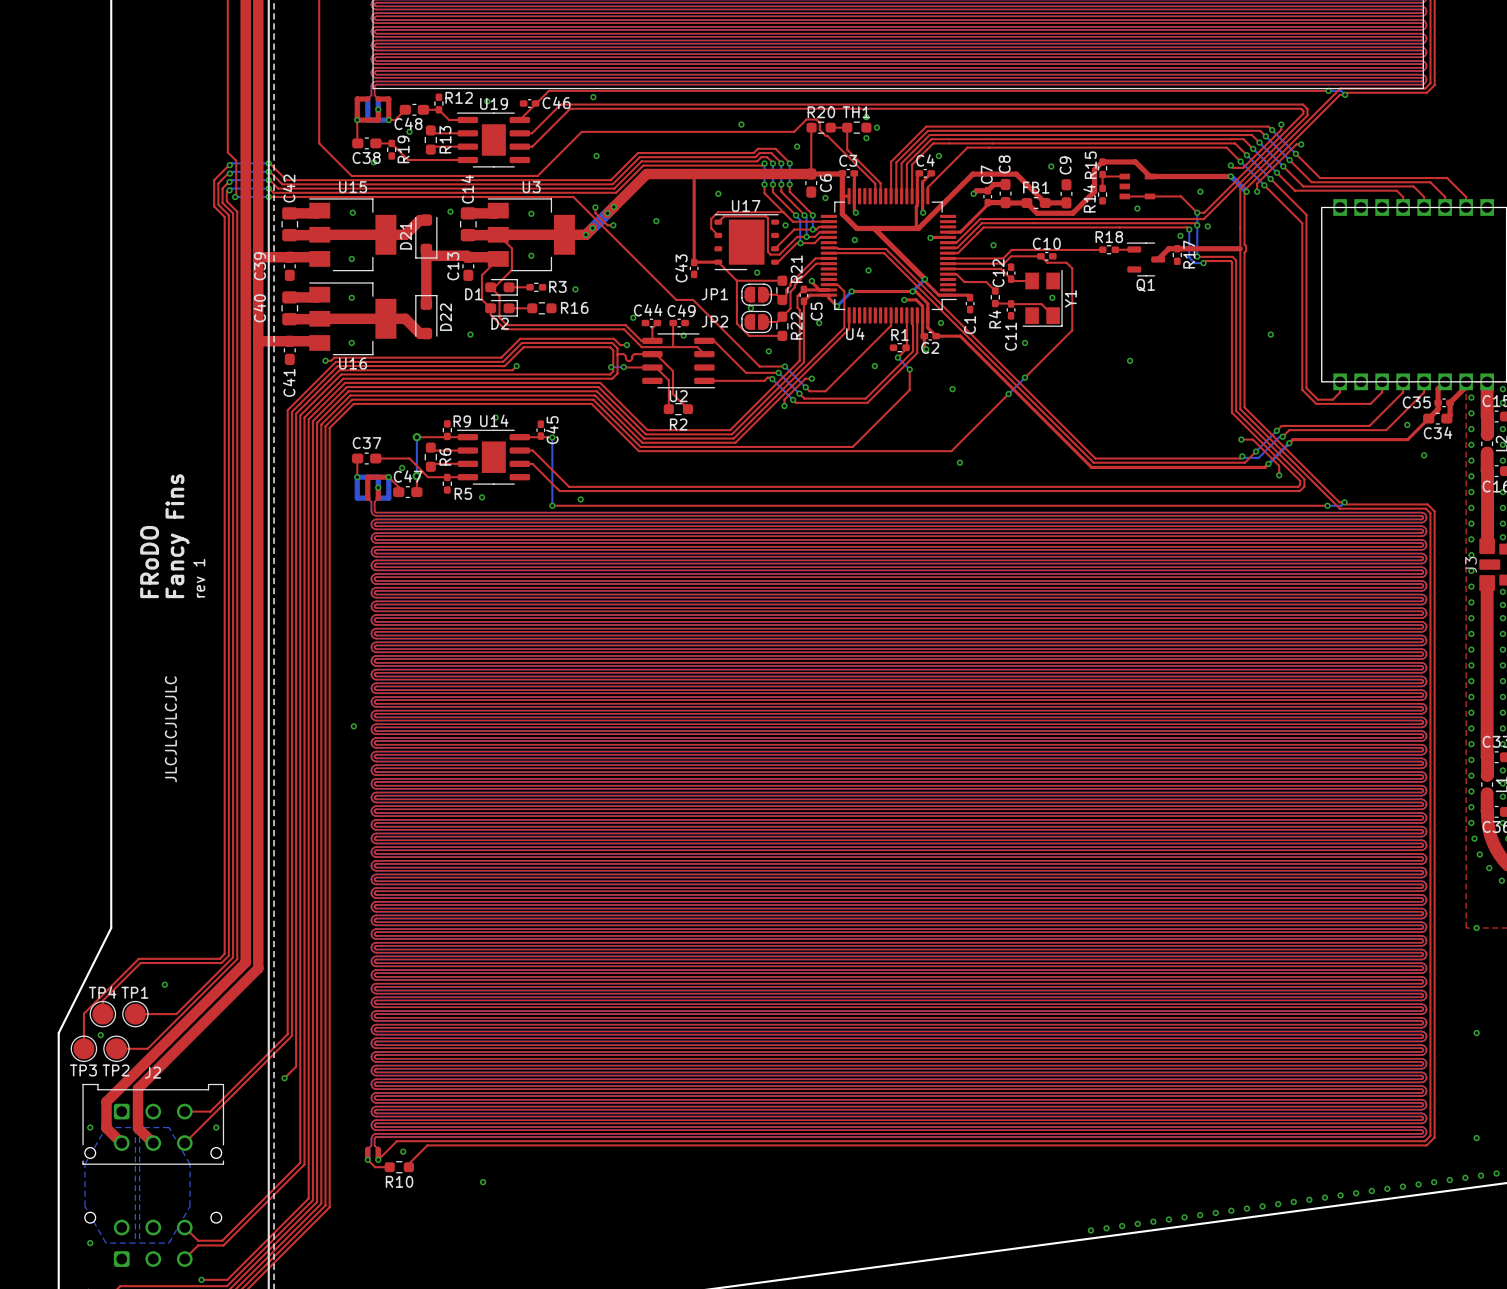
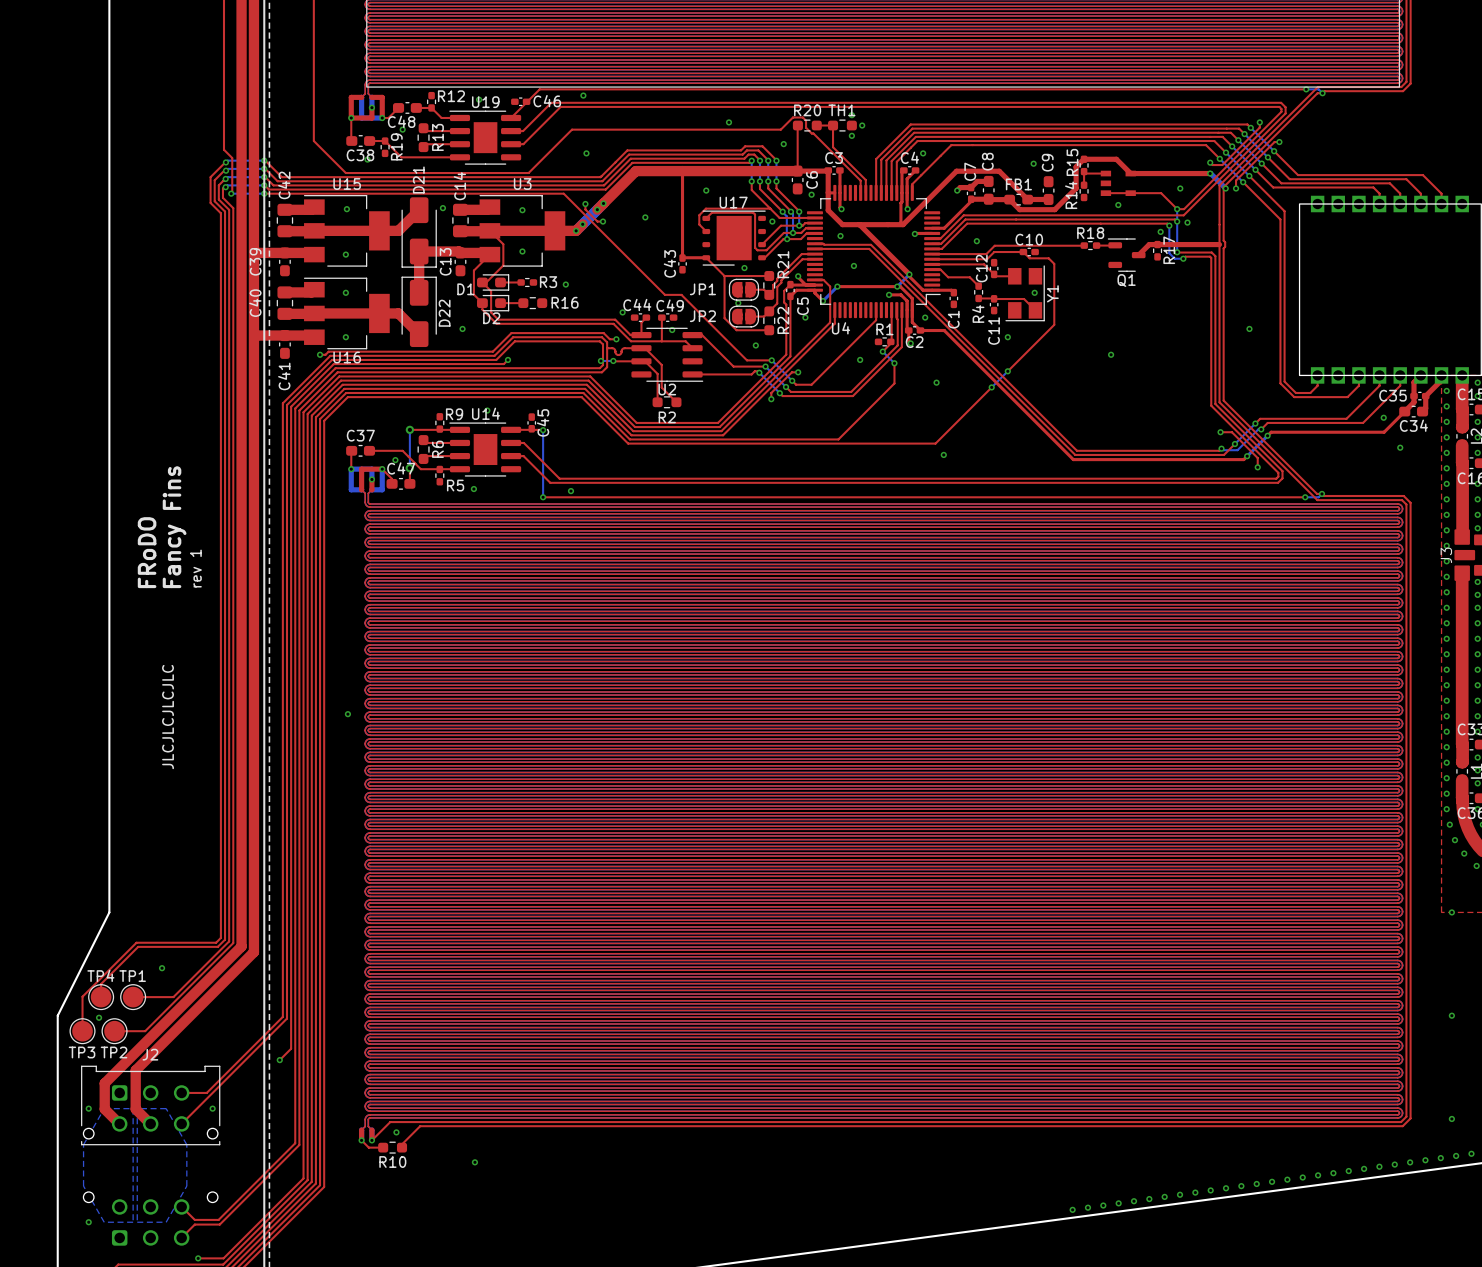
D21 footprint: [415, 214, 438, 259] -> [401, 197, 437, 268]
D21 name position: D21 (405, 235) -> D21 (418, 180)
D22 footprint: [415, 294, 438, 340] -> [401, 276, 437, 348]

